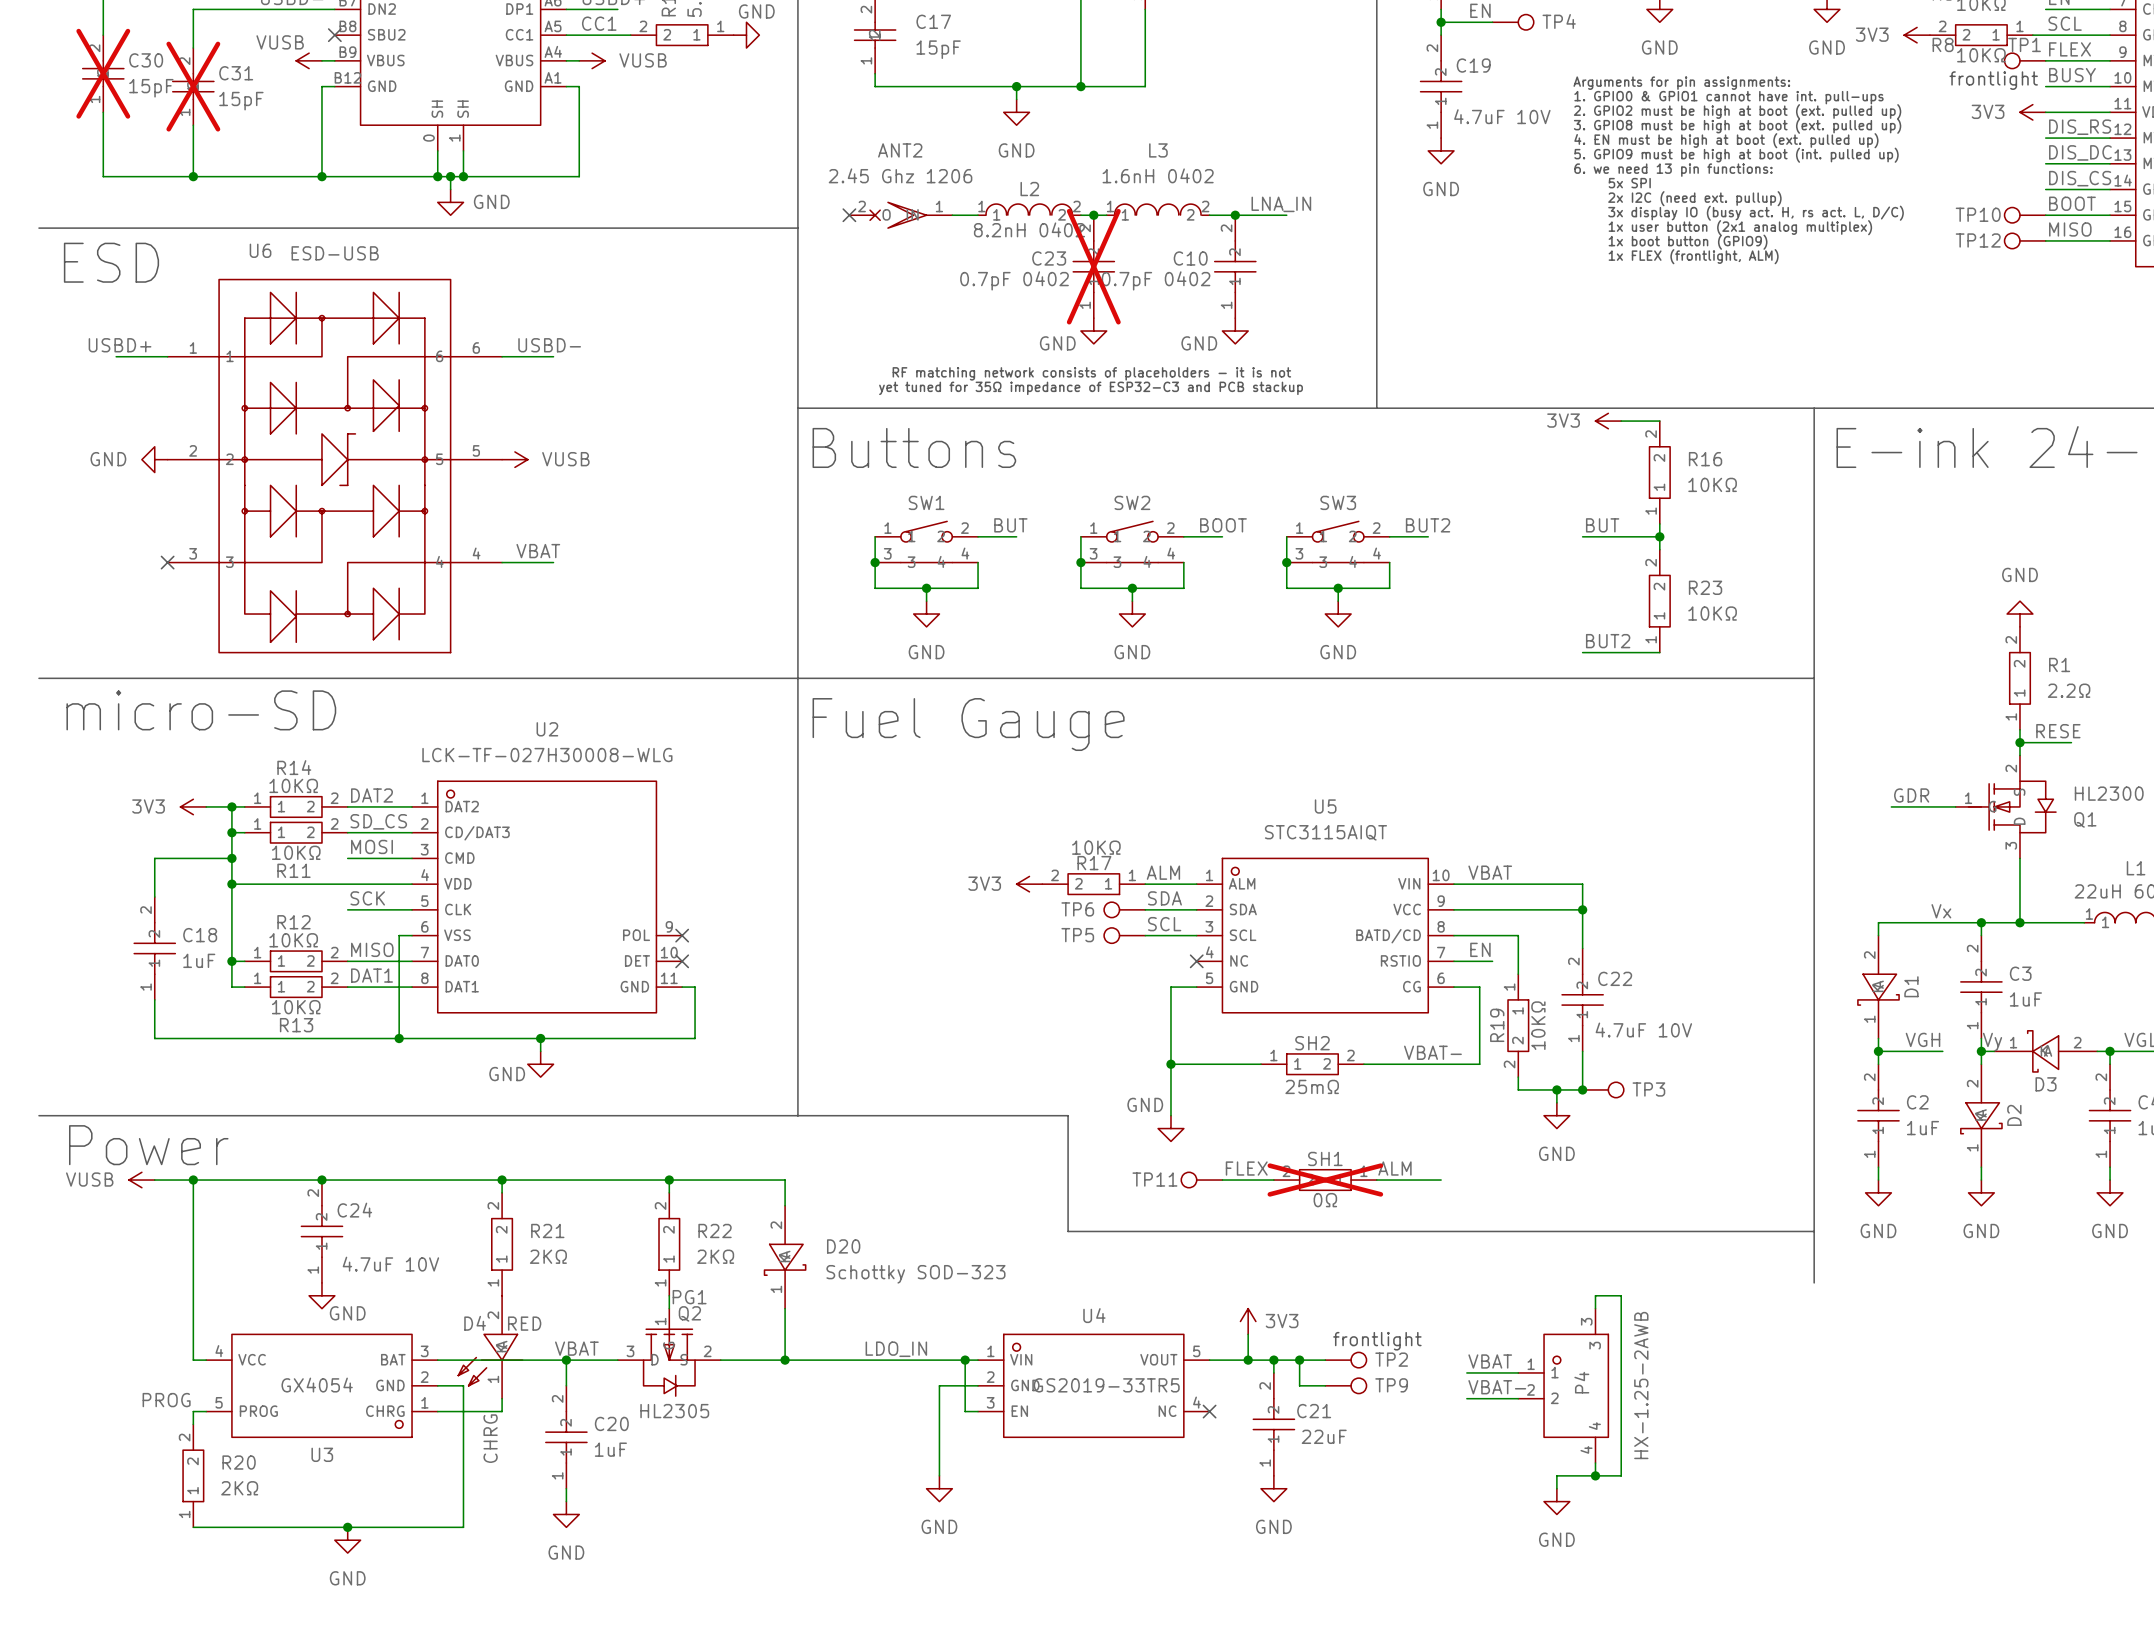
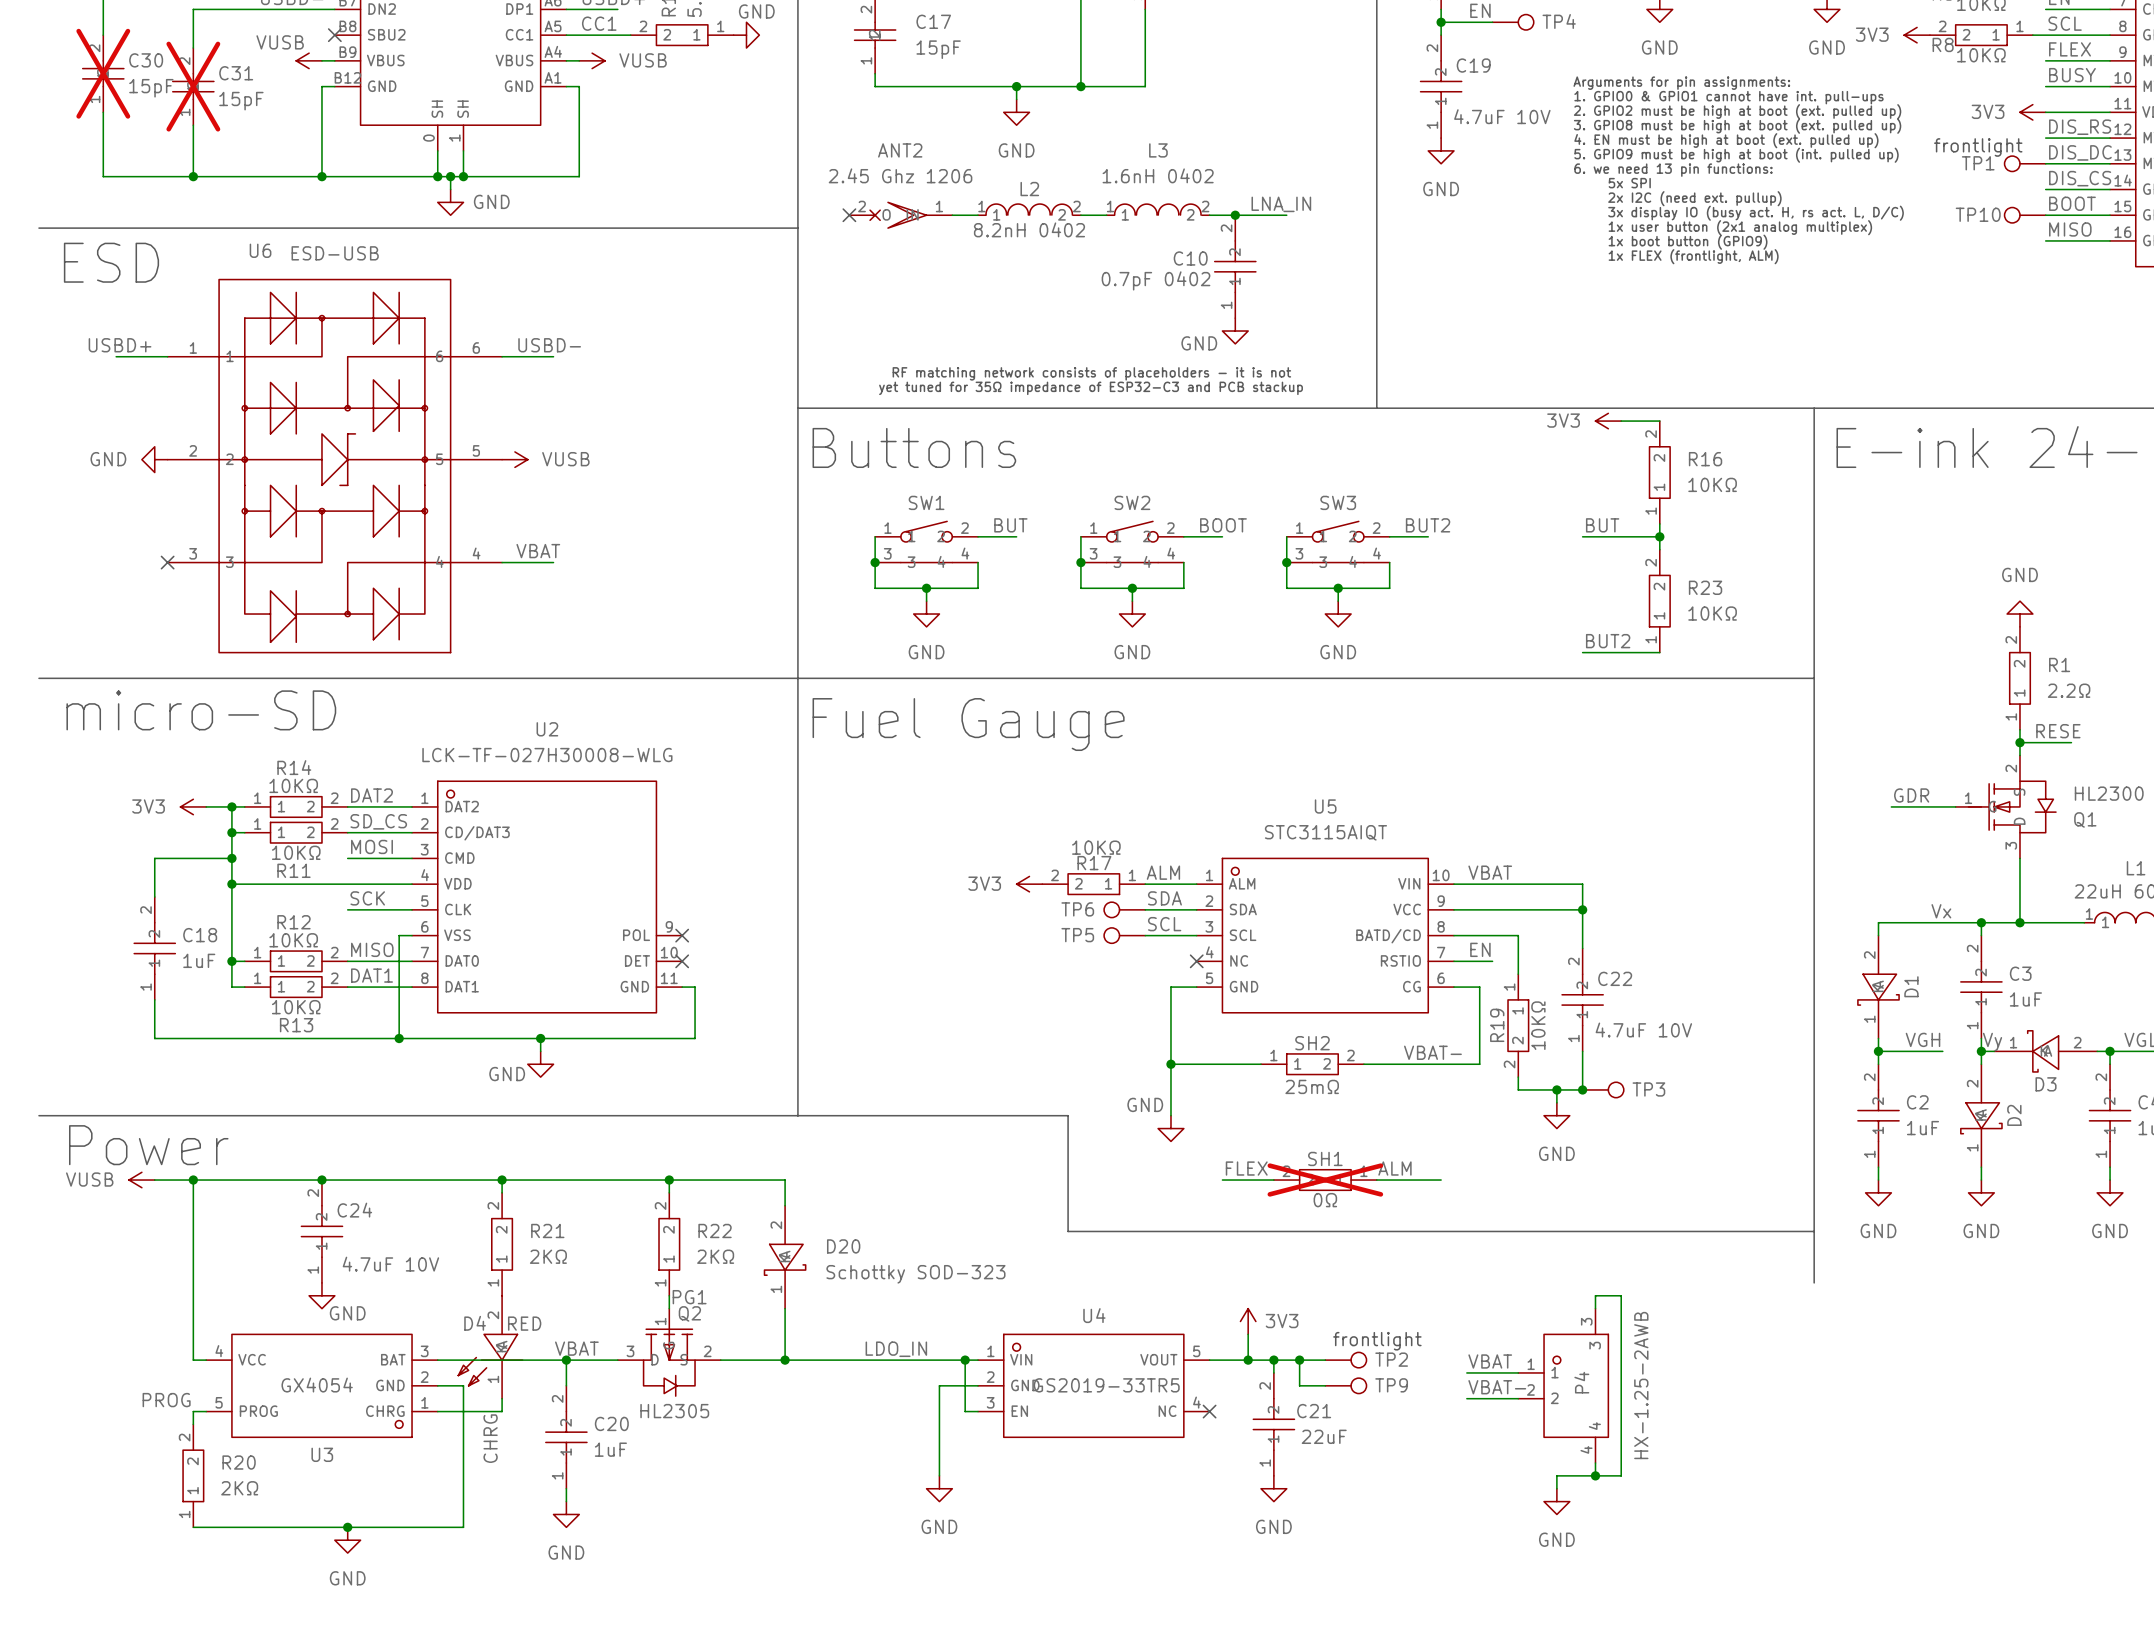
TP1 name position: TP1 (2024, 44) -> TP1 (1978, 163)
TP1 position: (2025, 60) -> (2025, 163)
text position: frontlight (1993, 80) -> frontlight (1978, 147)
junction: (1093, 215) -> none
TP12: (2025, 240) -> none
C23: 0.7pF 0402 (1093, 266) -> none
power symbol: GND (1093, 331) -> none
TP11: (1201, 1180) -> none

